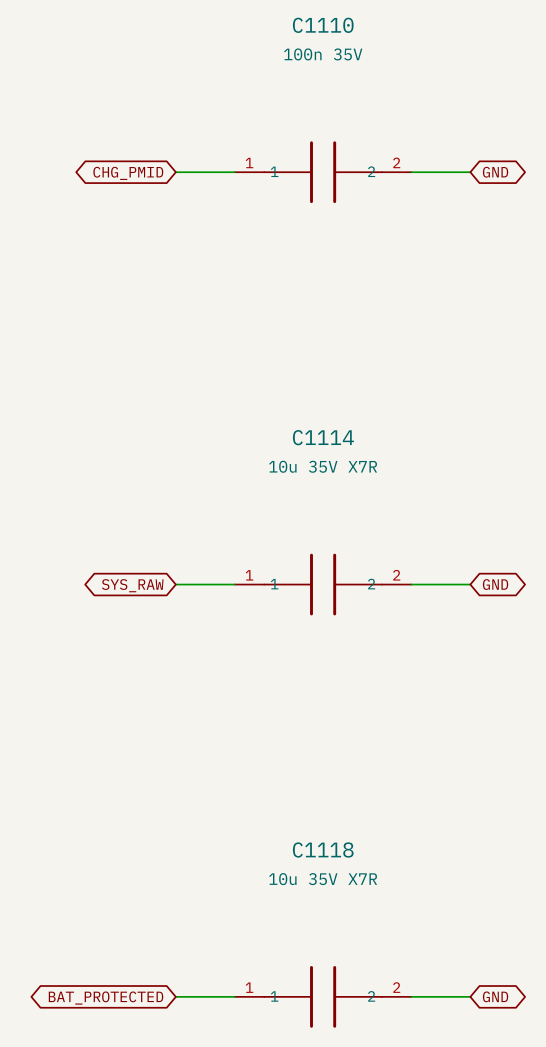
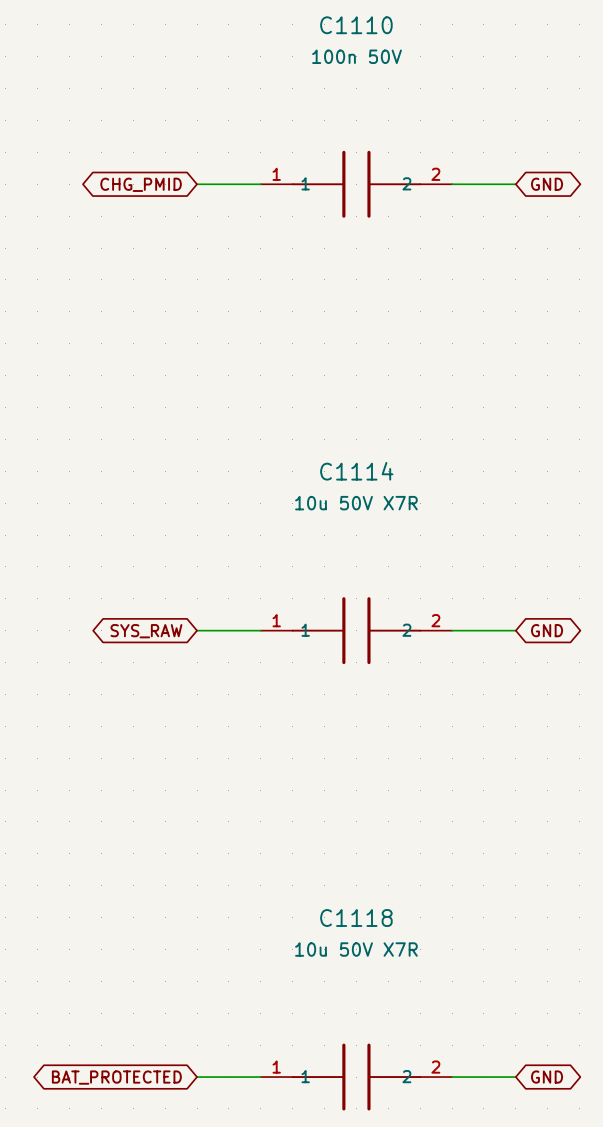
C1110 value: 100n 35V (323, 54) -> 100n 50V (357, 56)
C1114 value: 10u 35V X7R (323, 466) -> 10u 50V X7R (356, 503)
C1118 value: 10u 35V X7R (323, 879) -> 10u 50V X7R (356, 949)

